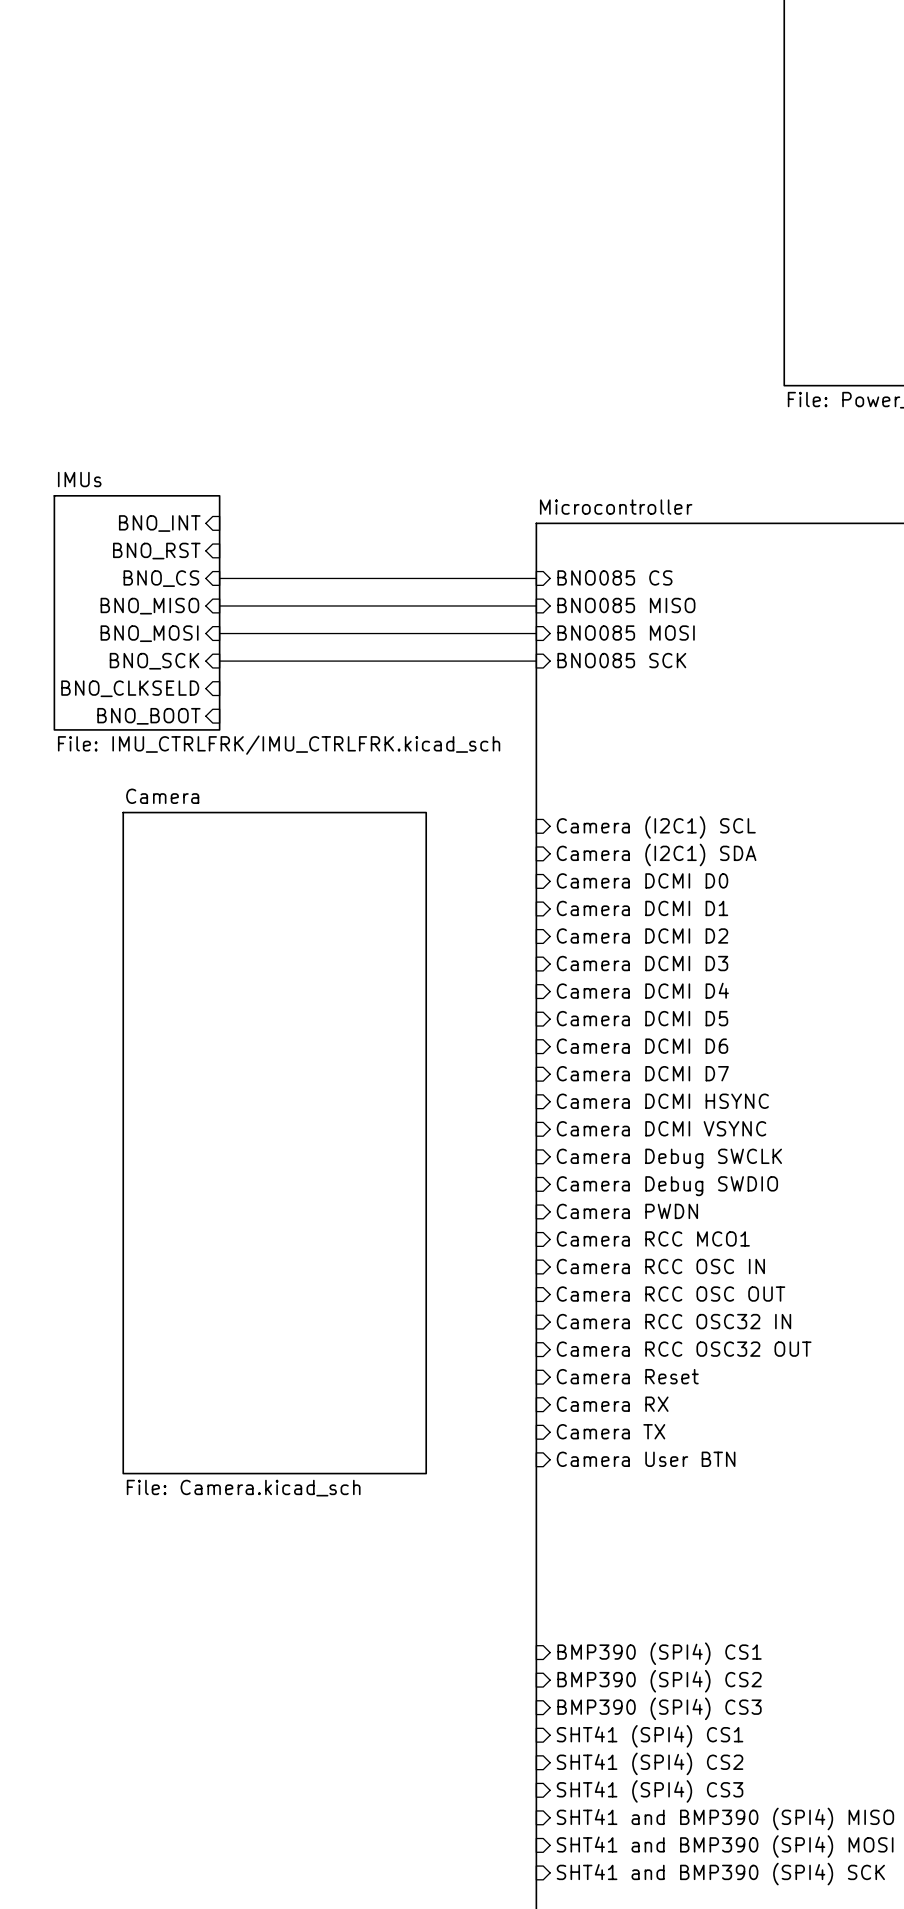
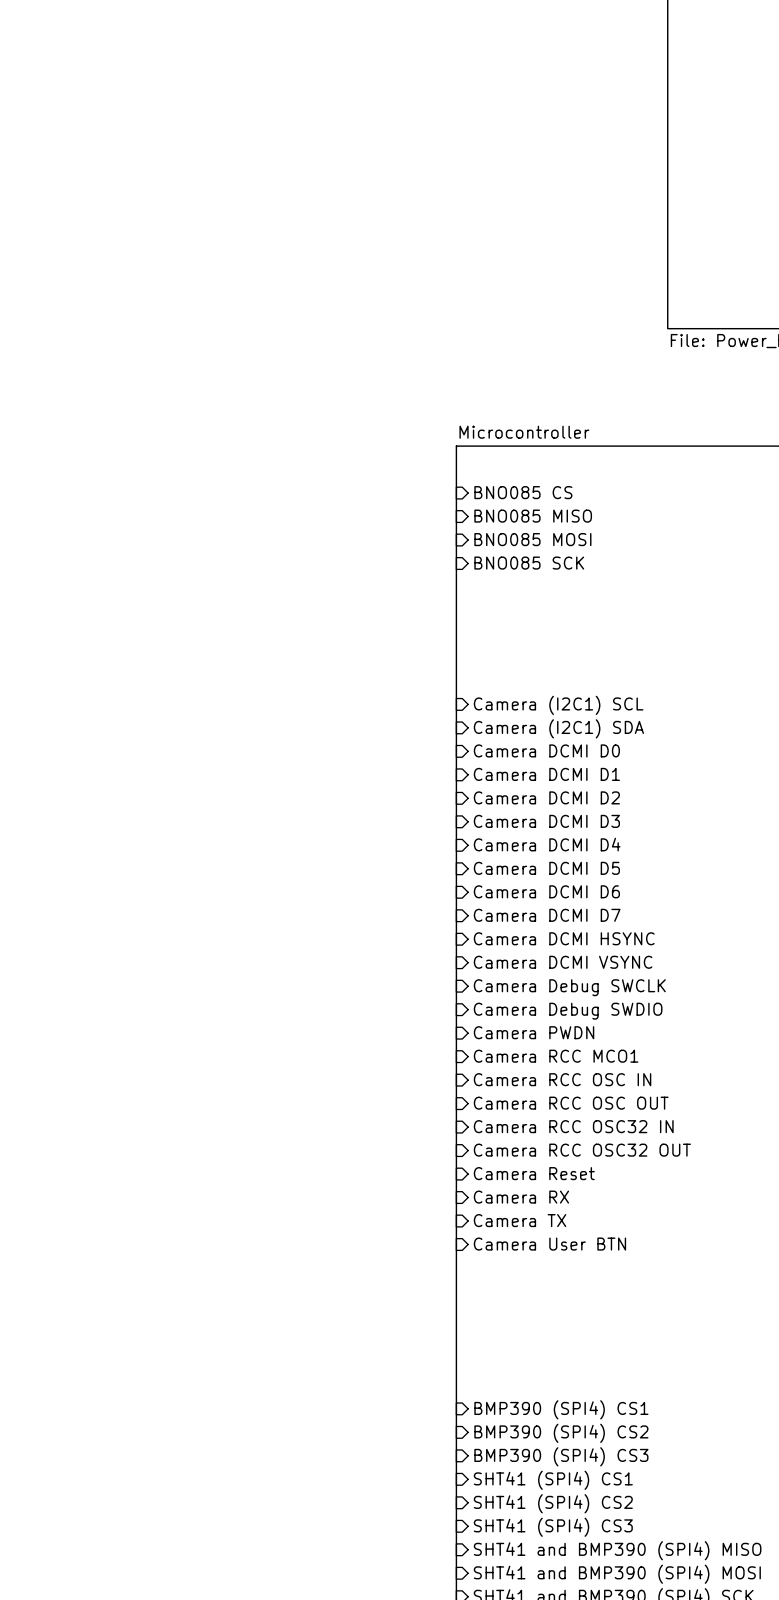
sheet pin: BNO_INT (159, 523) -> none
sheet pin: BNO_RST (156, 551) -> none
sheet pin: BNO_CS (161, 578) -> none
wire: (219, 578) (536, 578) -> none
wire: (219, 605) (536, 605) -> none
sheet pin: BNO_MISO (149, 606) -> none
sheet IMUs: File: IMU_CTRLFRK/IMU_CTRLFRK.kicad_sch (137, 612) -> none
sheet pin: BNO_MOSI (149, 633) -> none
wire: (219, 633) (536, 633) -> none
sheet pin: BNO_SCK (154, 661) -> none
wire: (219, 661) (536, 661) -> none
sheet pin: BNO_CLKSELD (130, 688) -> none
sheet pin: BNO_BOOT (148, 716) -> none
sheet Camera: File: Camera.kicad_sch (274, 1143) -> none

